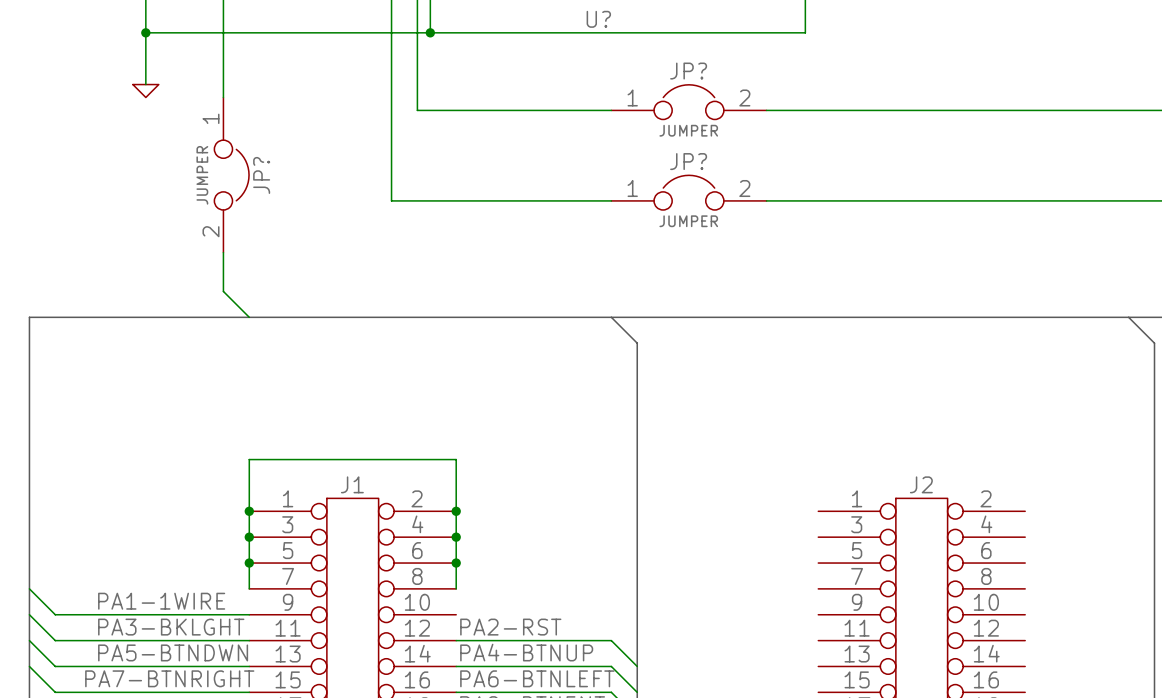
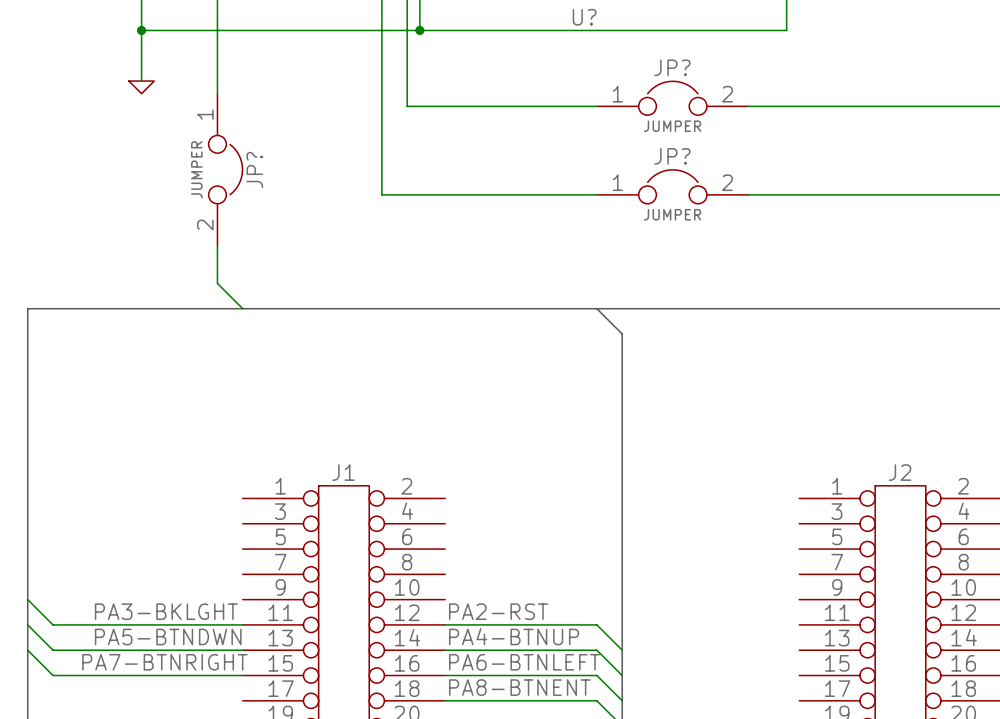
junction: (249, 511) -> none
junction: (456, 511) -> none
junction: (249, 537) -> none
junction: (456, 537) -> none
junction: (249, 563) -> none
junction: (456, 563) -> none
wire: (29, 588) (55, 614) (249, 614) -> none
wire: (249, 588) (249, 459) (456, 459) (456, 588) -> none
label: PA1-1WIRE (161, 601) -> none

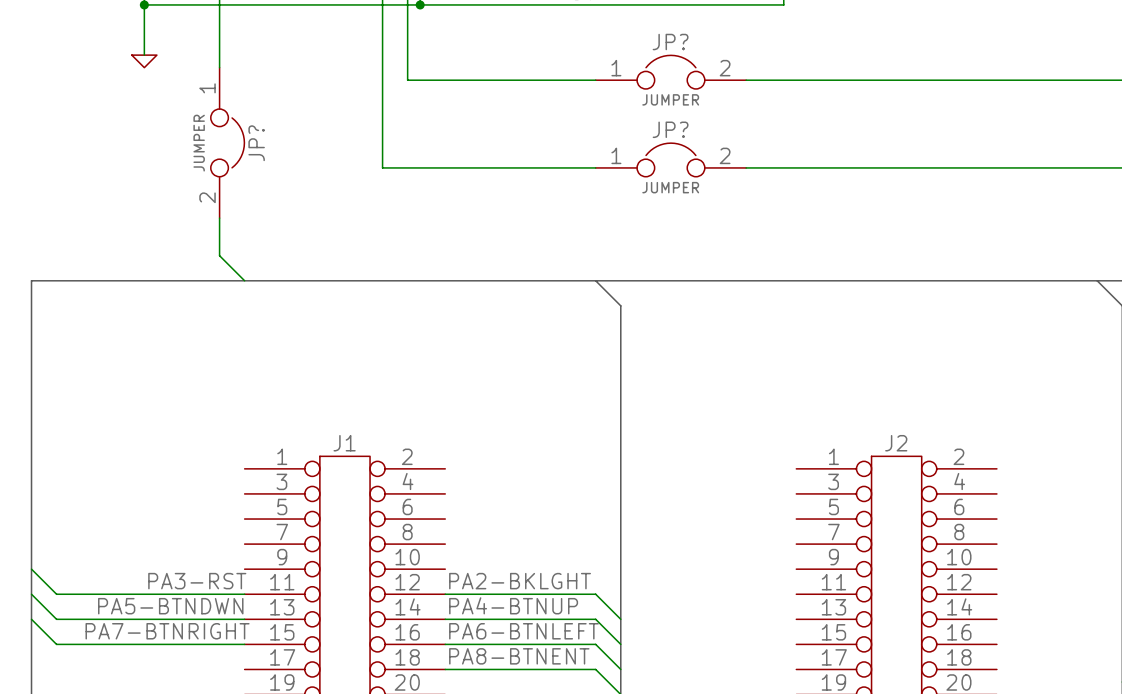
label: PA3-BKLGHT (166, 611) -> none
label: none -> PA3-RST (197, 581)
label: PA2-RST (498, 611) -> PA2-BKLGHT (520, 581)

